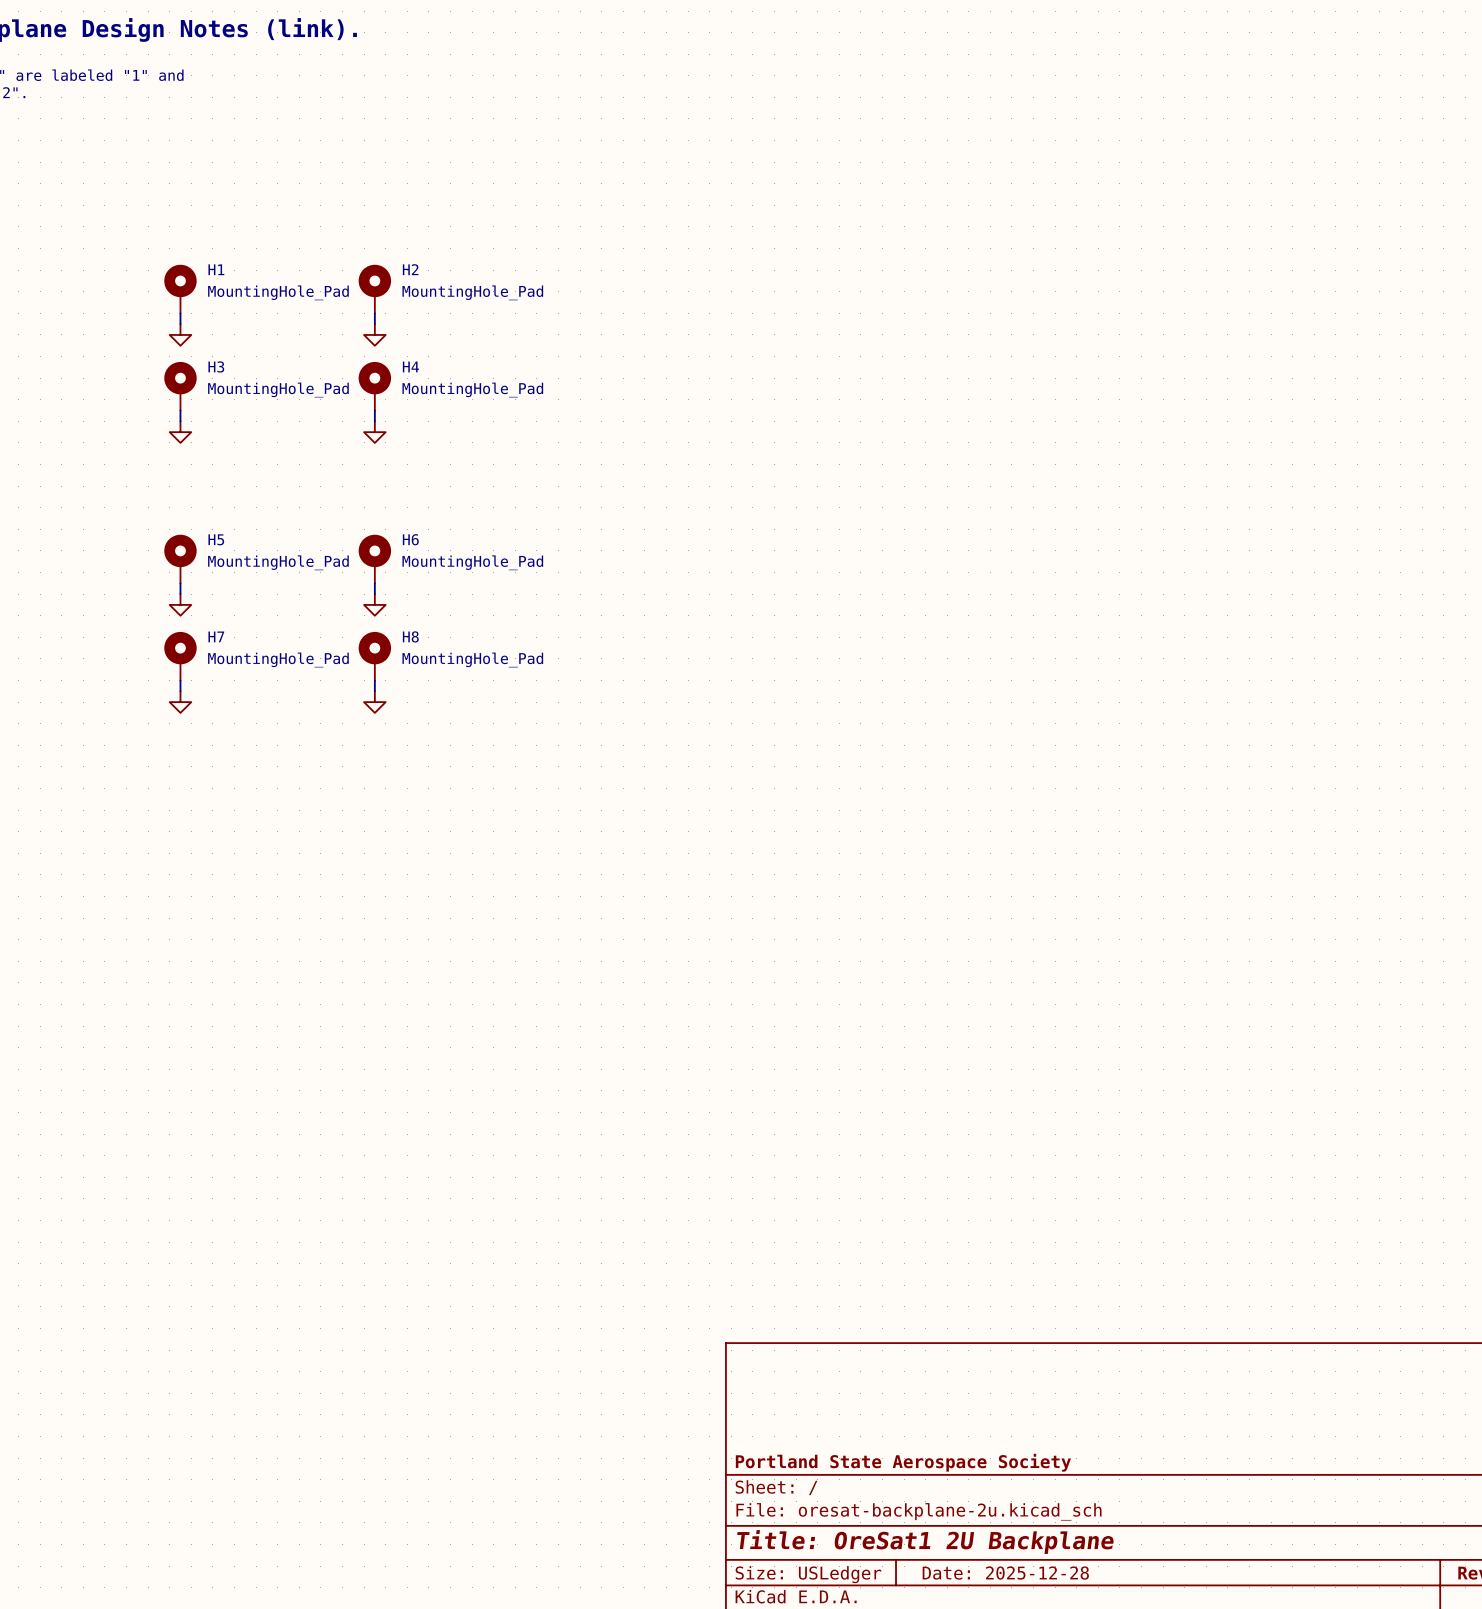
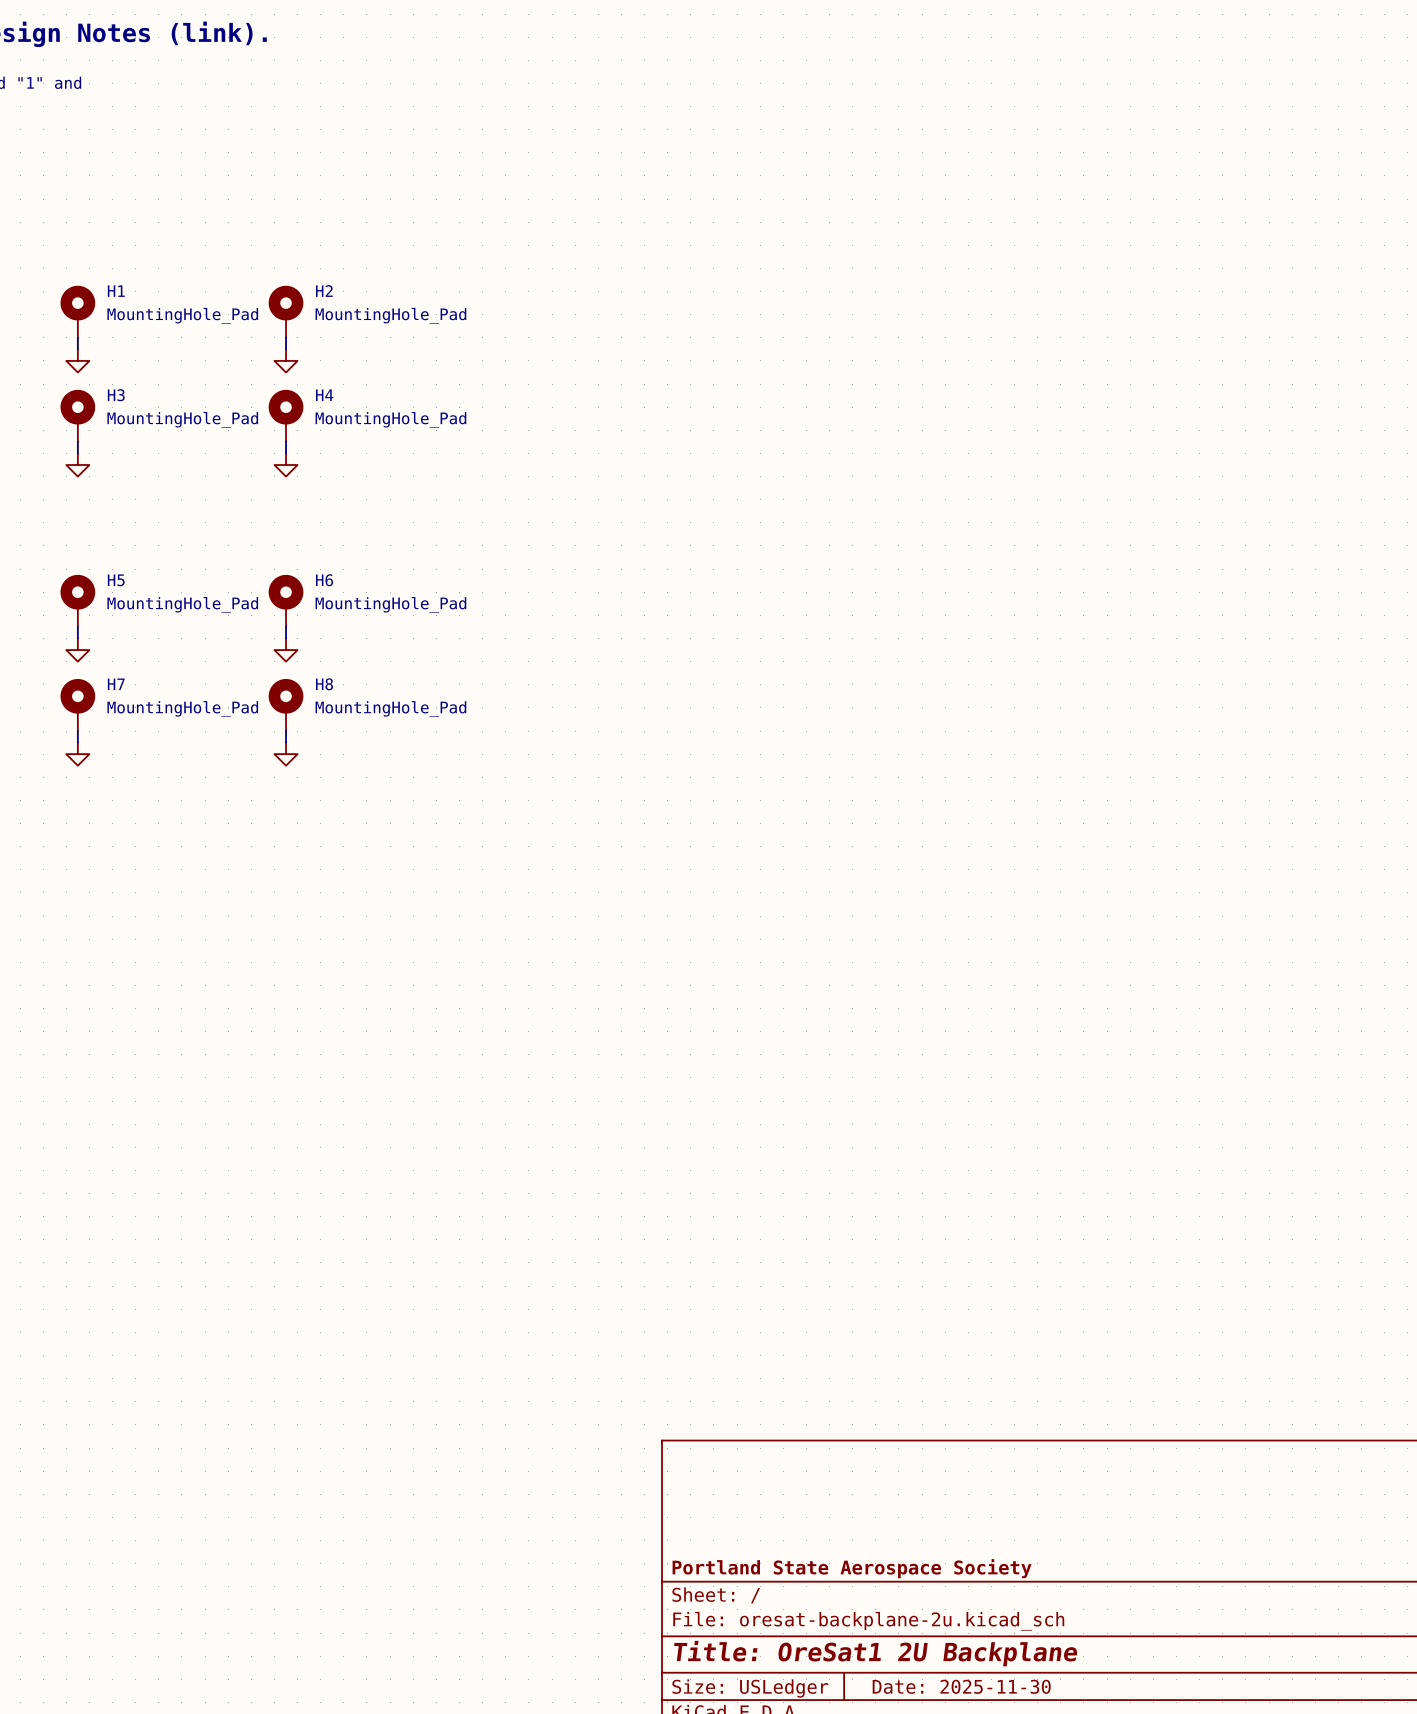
title block: Date: 2025-12-28 (1005, 1573) -> Date: 2025-11-30 (961, 1686)

